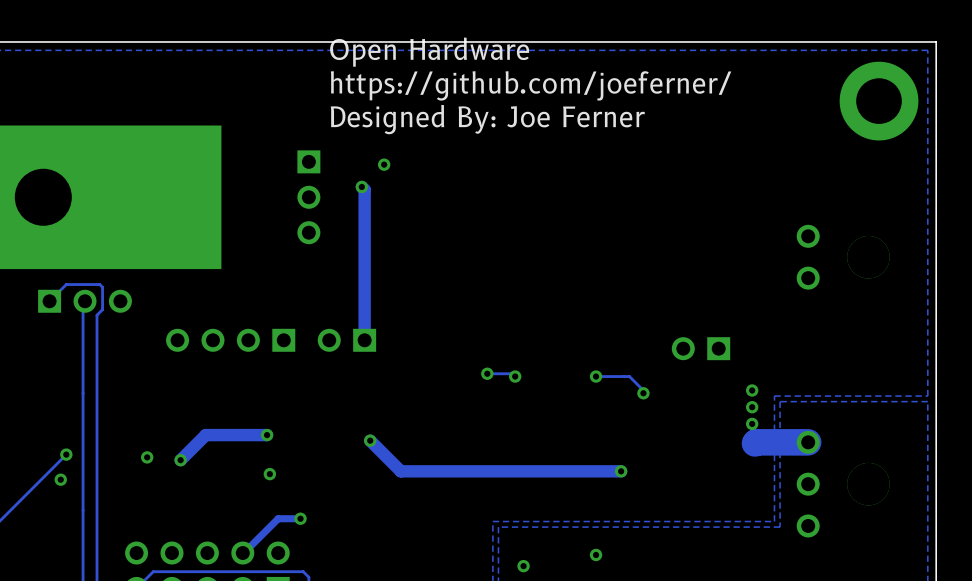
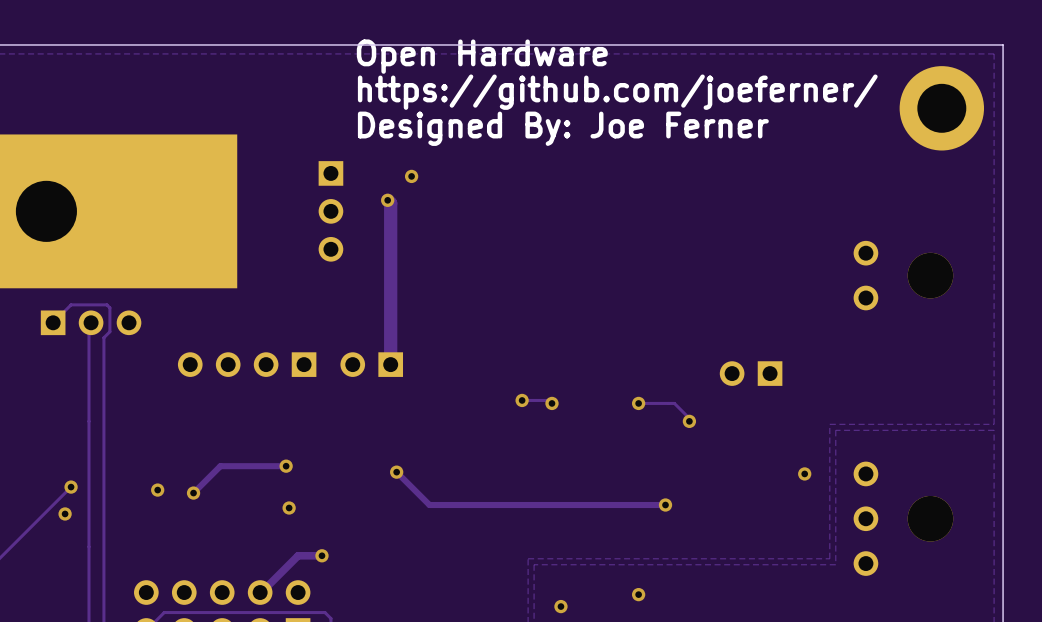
via: (752, 390) -> none
via: (752, 407) -> none
via: (752, 423) -> none
track width: thick (267, 435) (205, 435) (180, 460) -> thin (286, 466) (220, 466) (193, 493)
track width: thick (370, 440) (400, 471) (621, 471) -> thin (396, 472) (429, 505) (665, 505)
via: none -> (804, 473)
track: (808, 442) (754, 443) -> none

